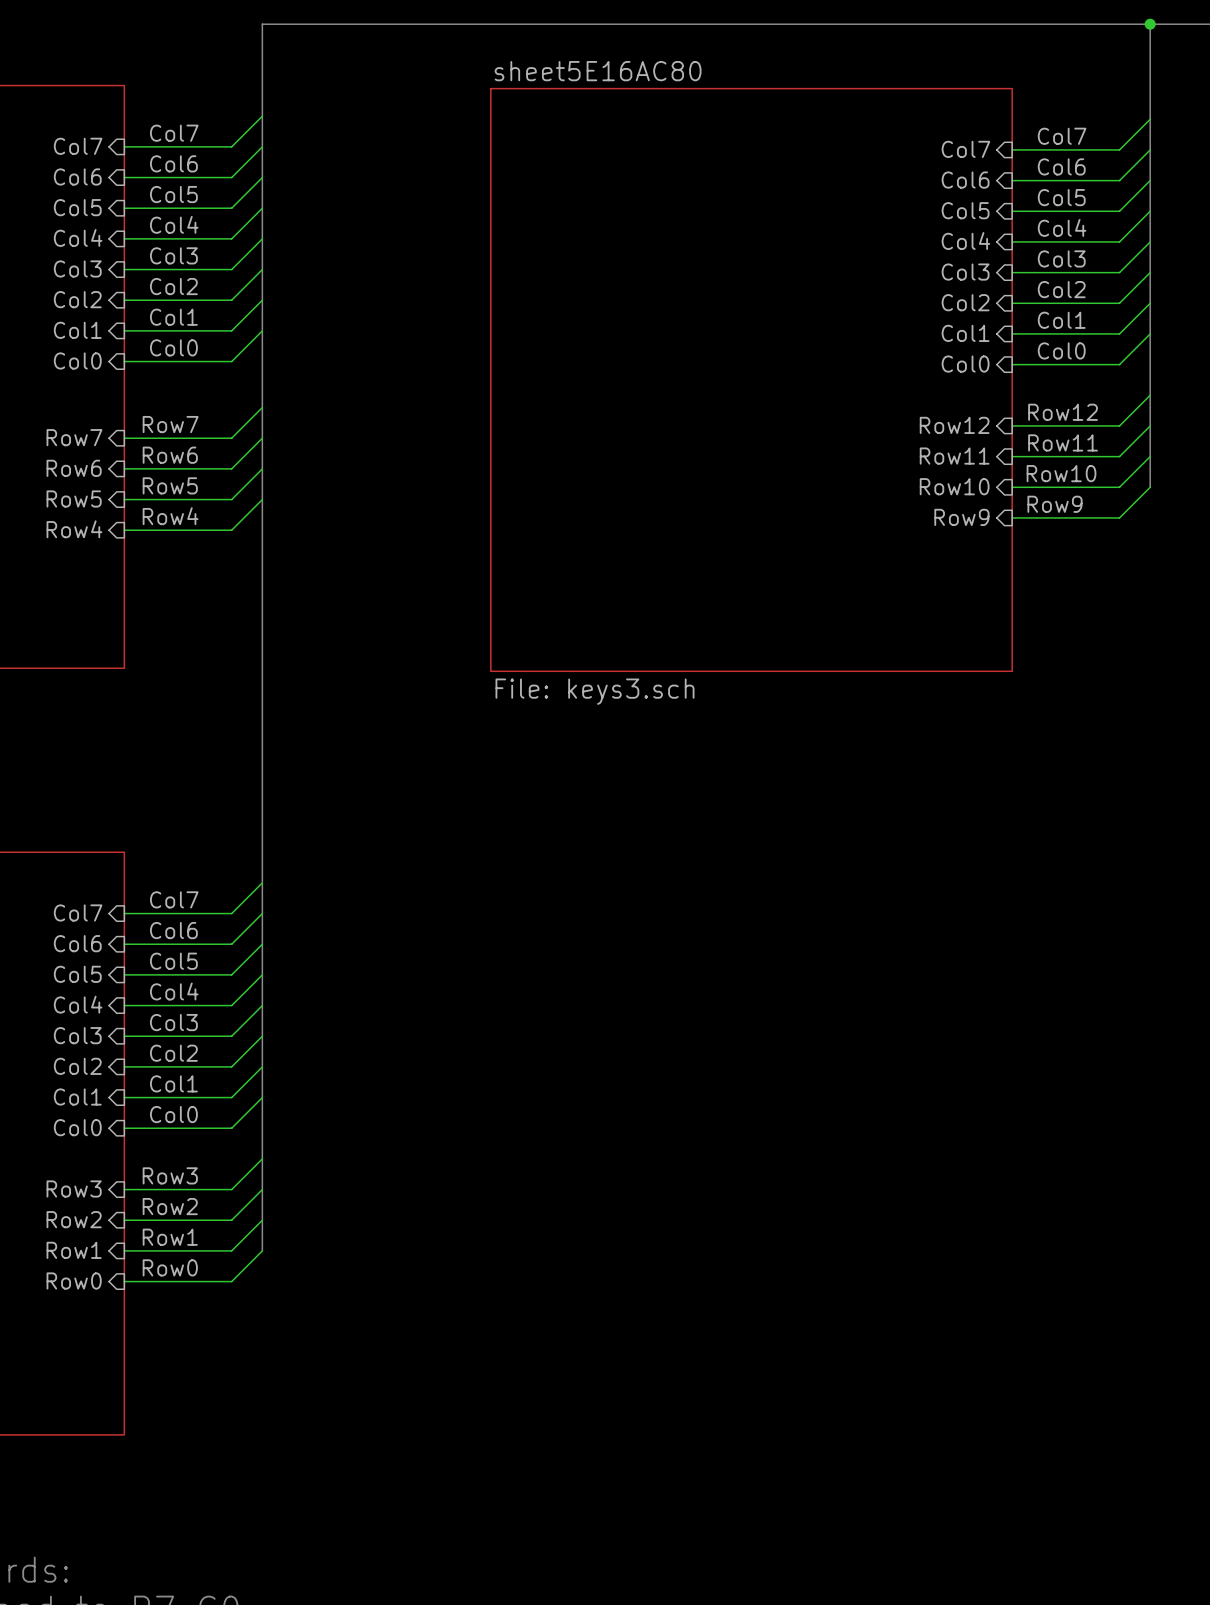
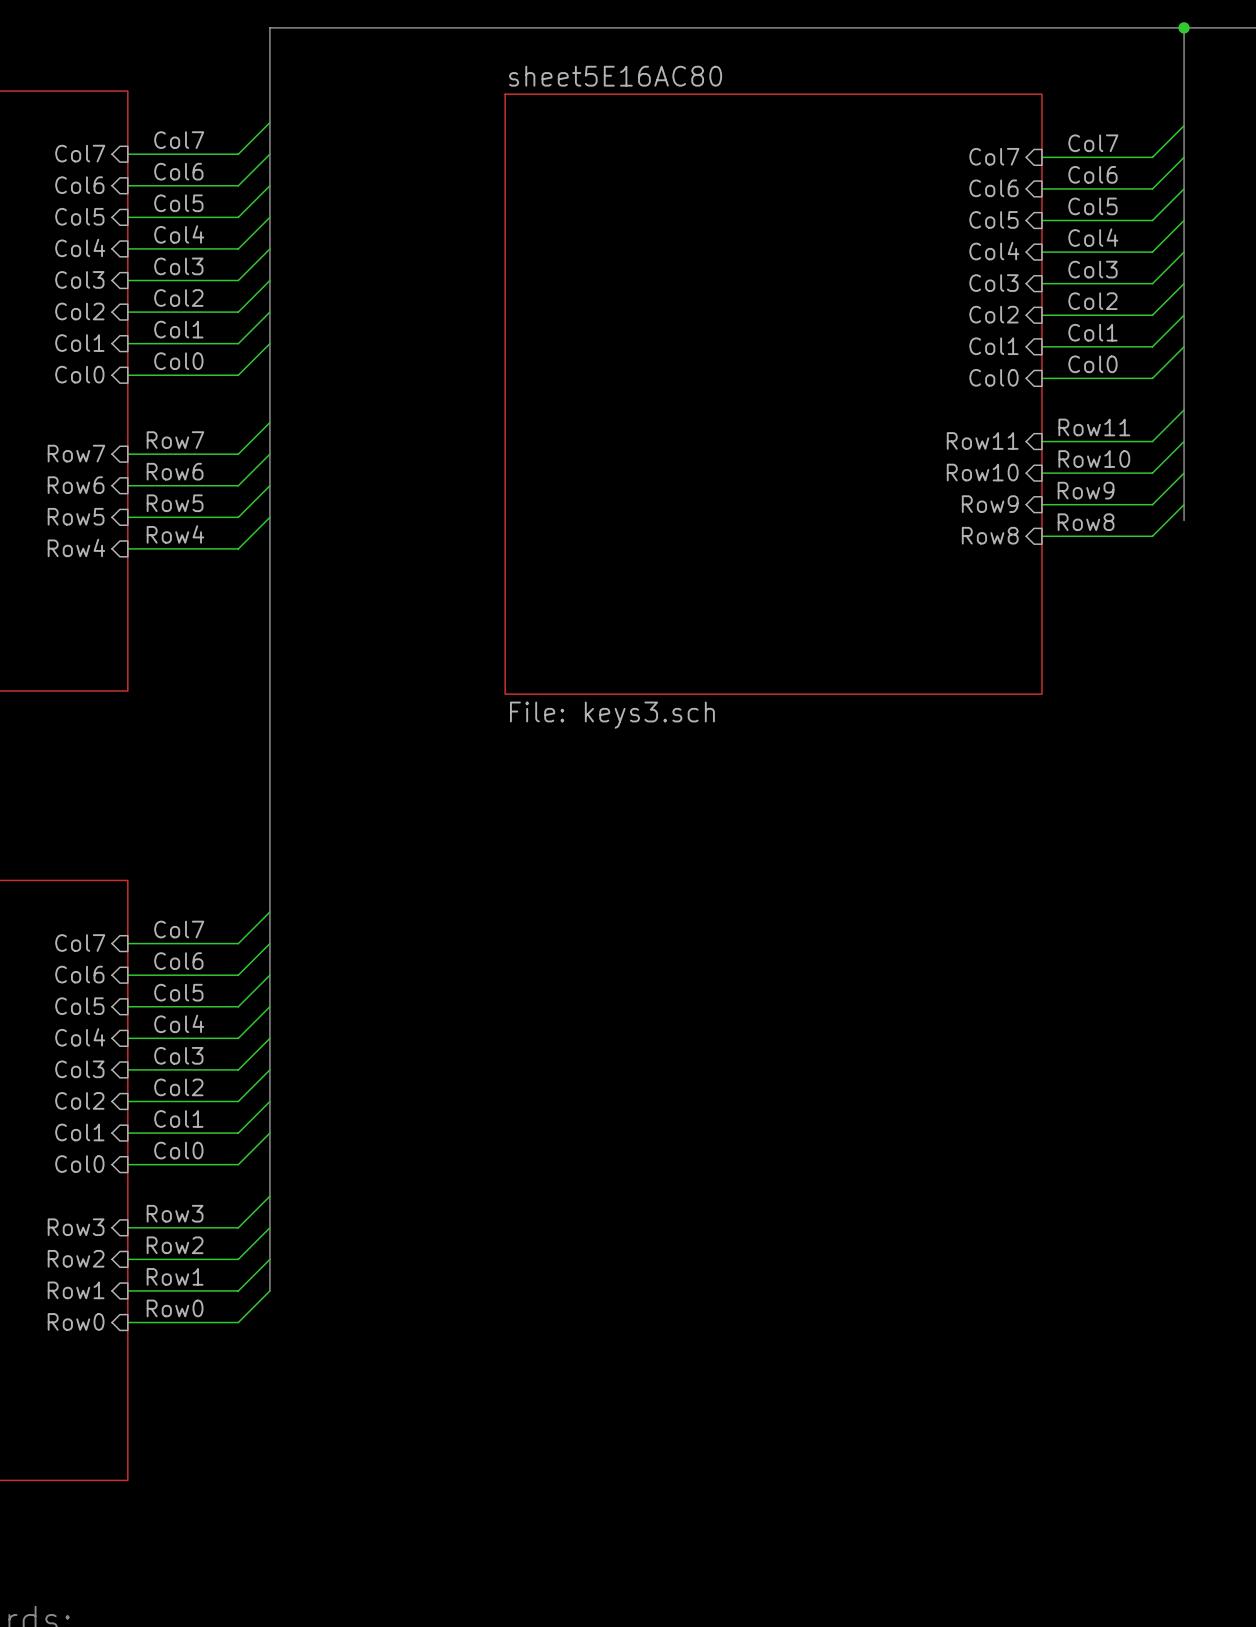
label: Row12 (1063, 412) -> Row11 (1094, 427)
sheet pin: Row12 (954, 425) -> Row11 (982, 440)
label: Row11 (1063, 442) -> Row10 (1094, 459)
sheet pin: Row11 (954, 456) -> Row10 (982, 472)
label: Row10 (1061, 473) -> Row9 (1086, 490)
sheet pin: Row10 (954, 486) -> Row9 (990, 504)
bus: none -> (1184, 504) (1184, 520)
label: Row9 (1054, 504) -> Row8 (1086, 522)
sheet pin: Row9 (961, 517) -> Row8 (990, 535)

